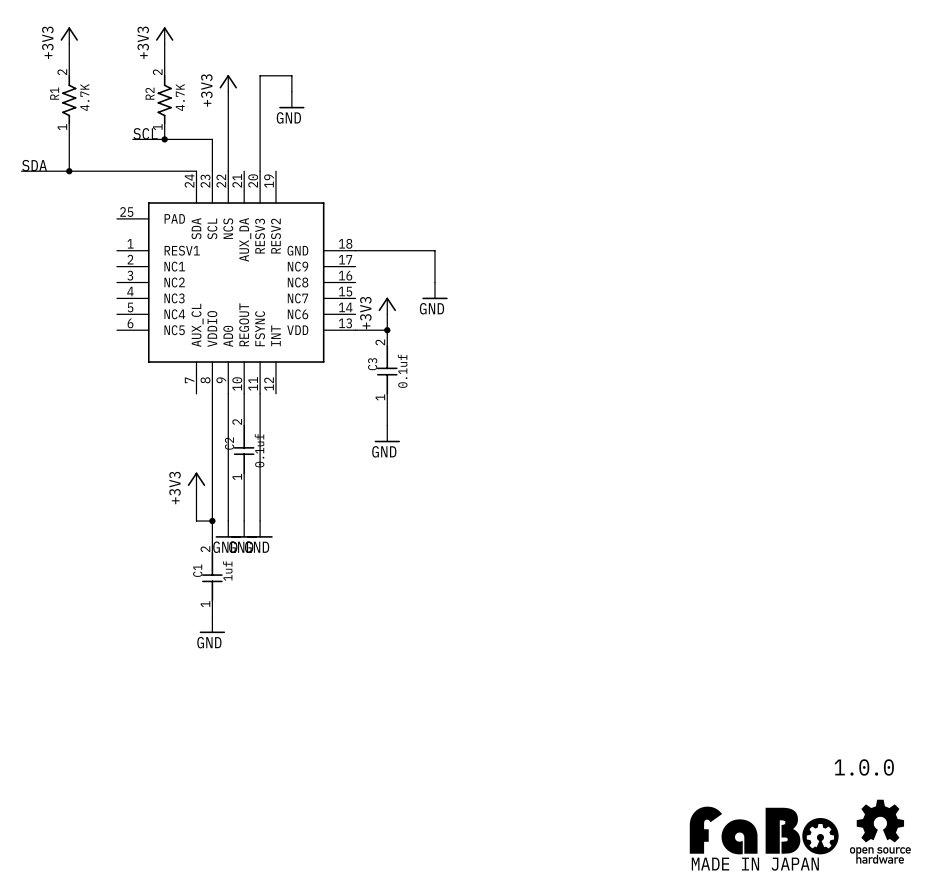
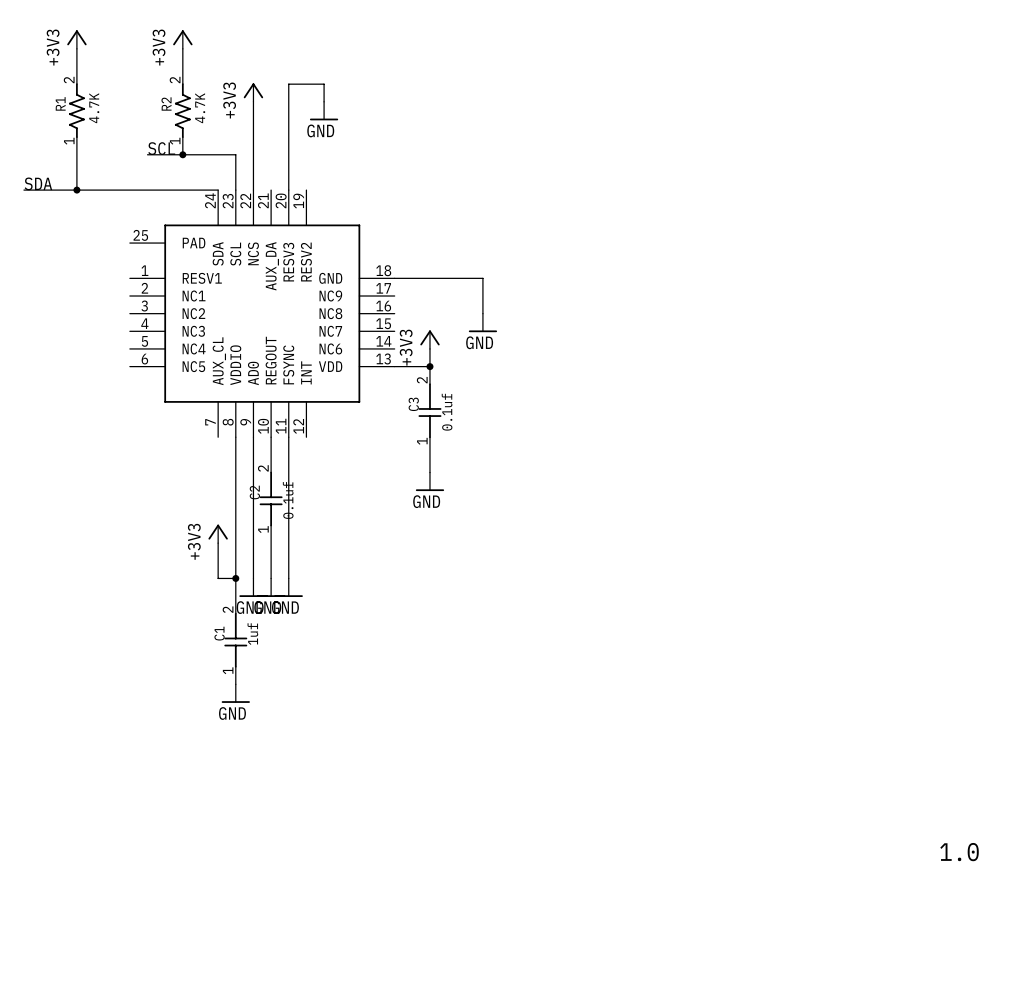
text: 1.0.0 (864, 767) -> 1.0 (959, 852)
part: (764, 830) -> none
part: (880, 831) -> none

